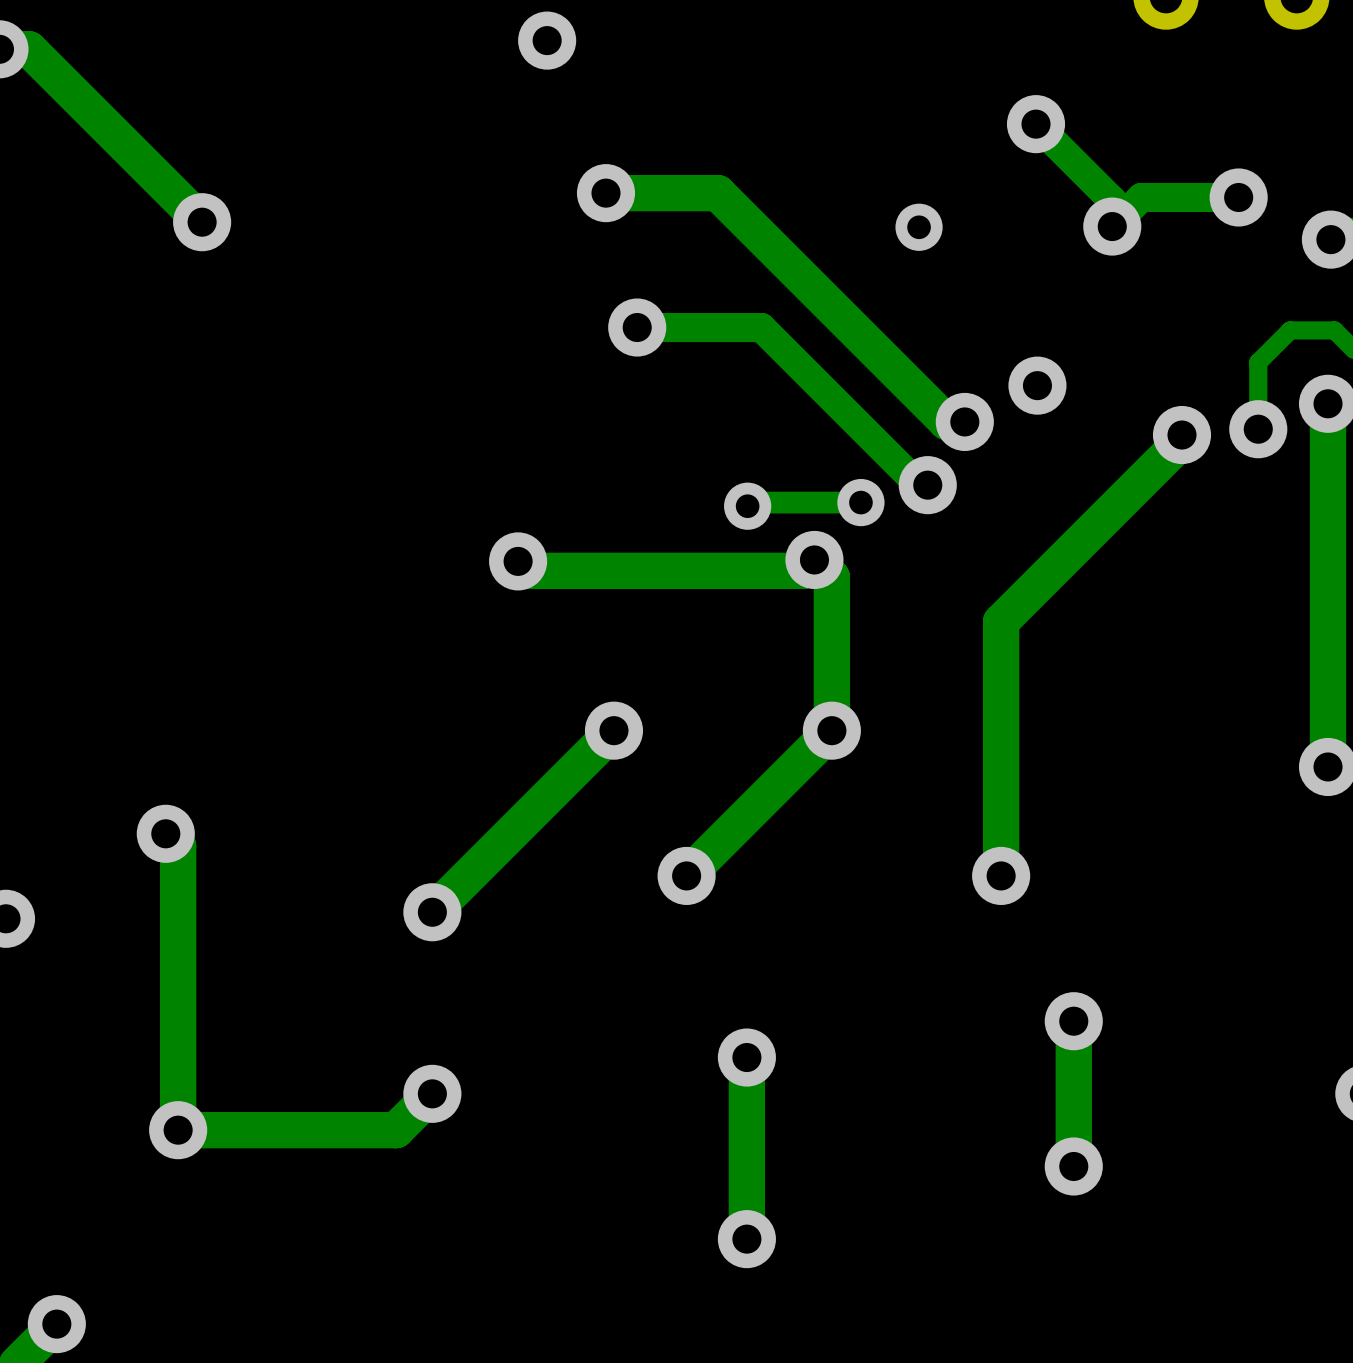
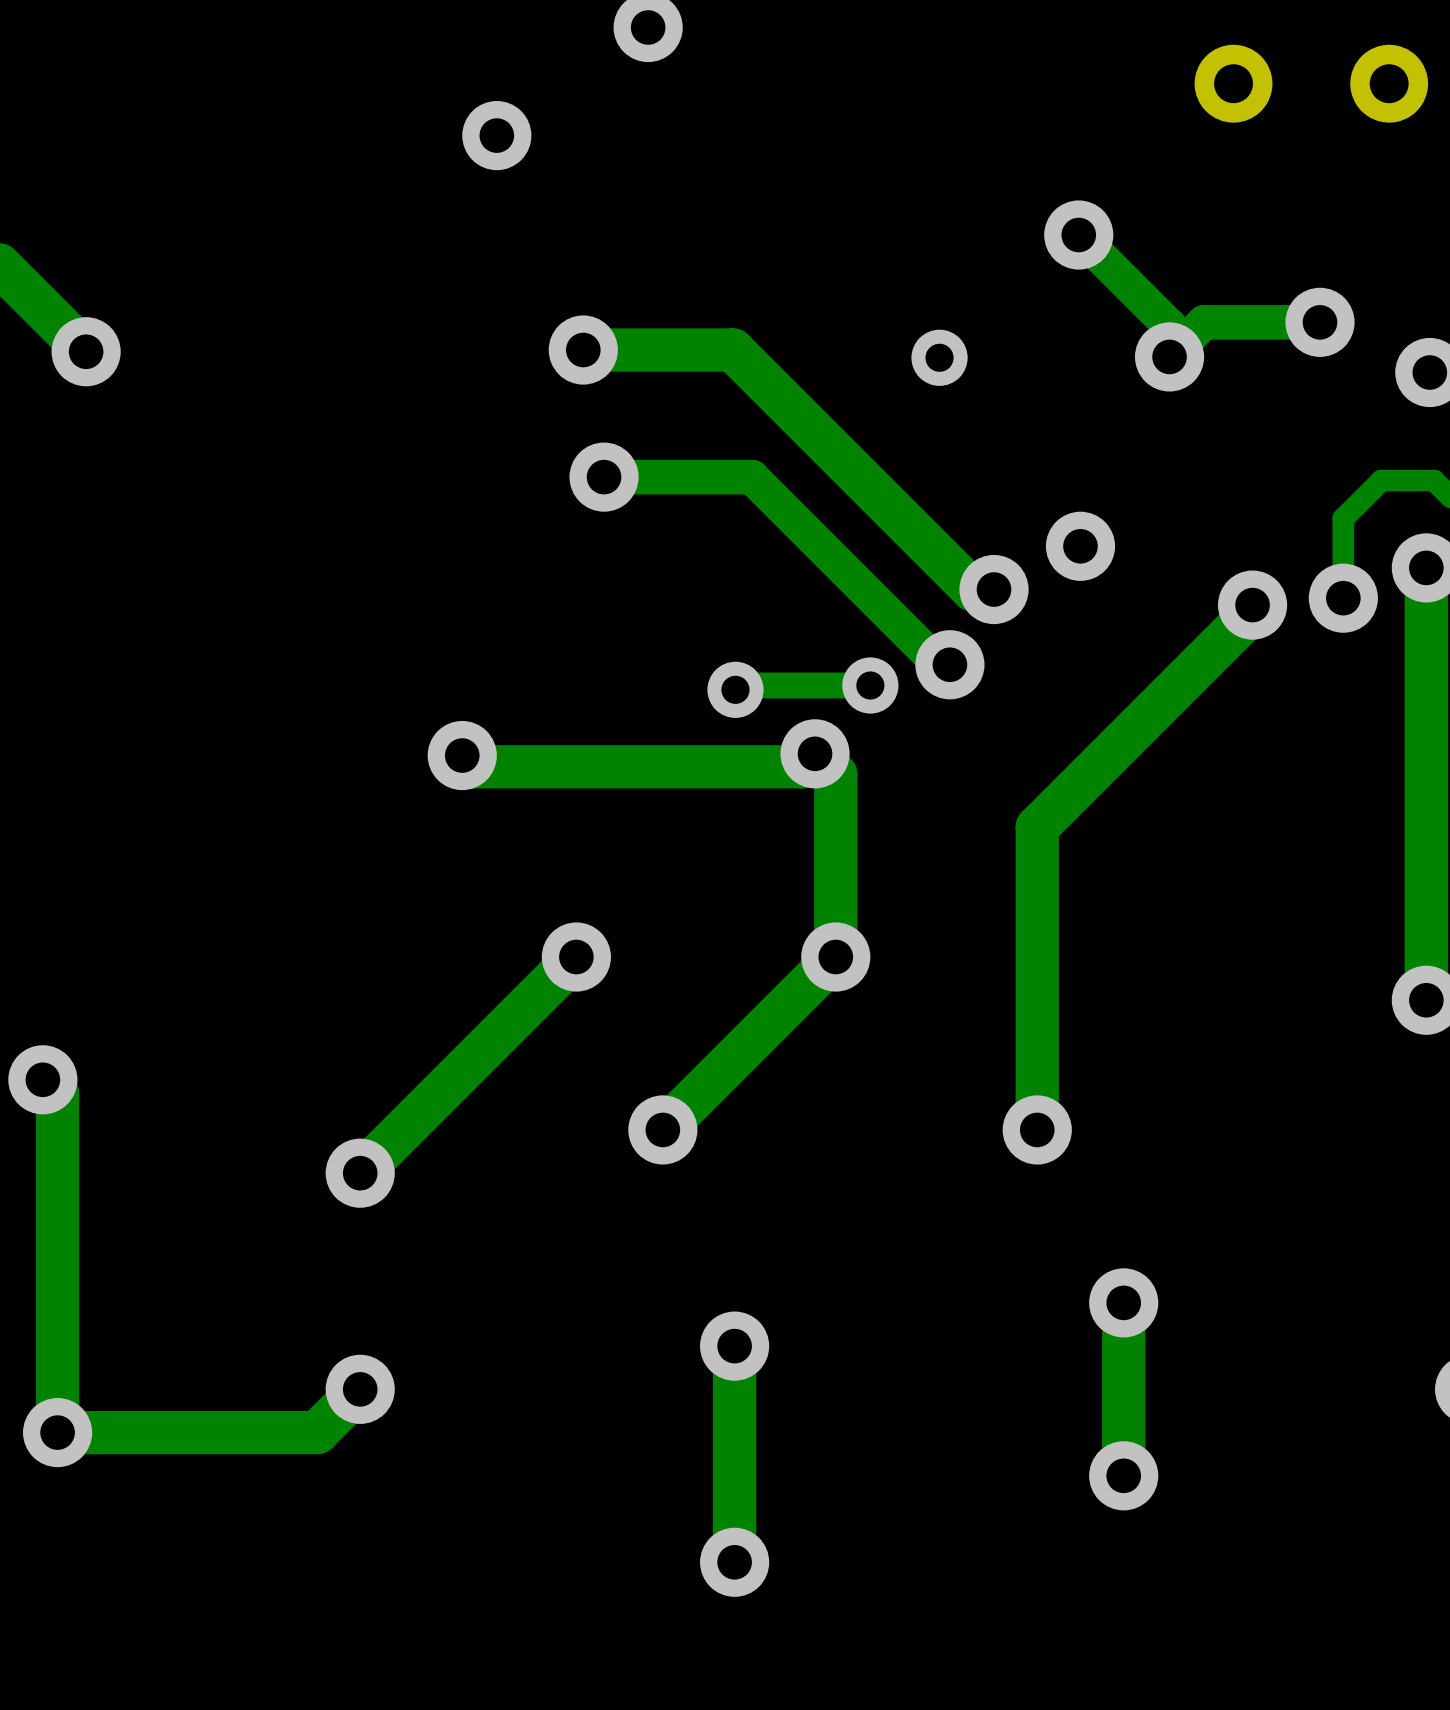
track: (605, 193) (717, 193) (745, 220) -> (583, 350) (732, 350)
via position: (605, 193) -> (583, 350)

